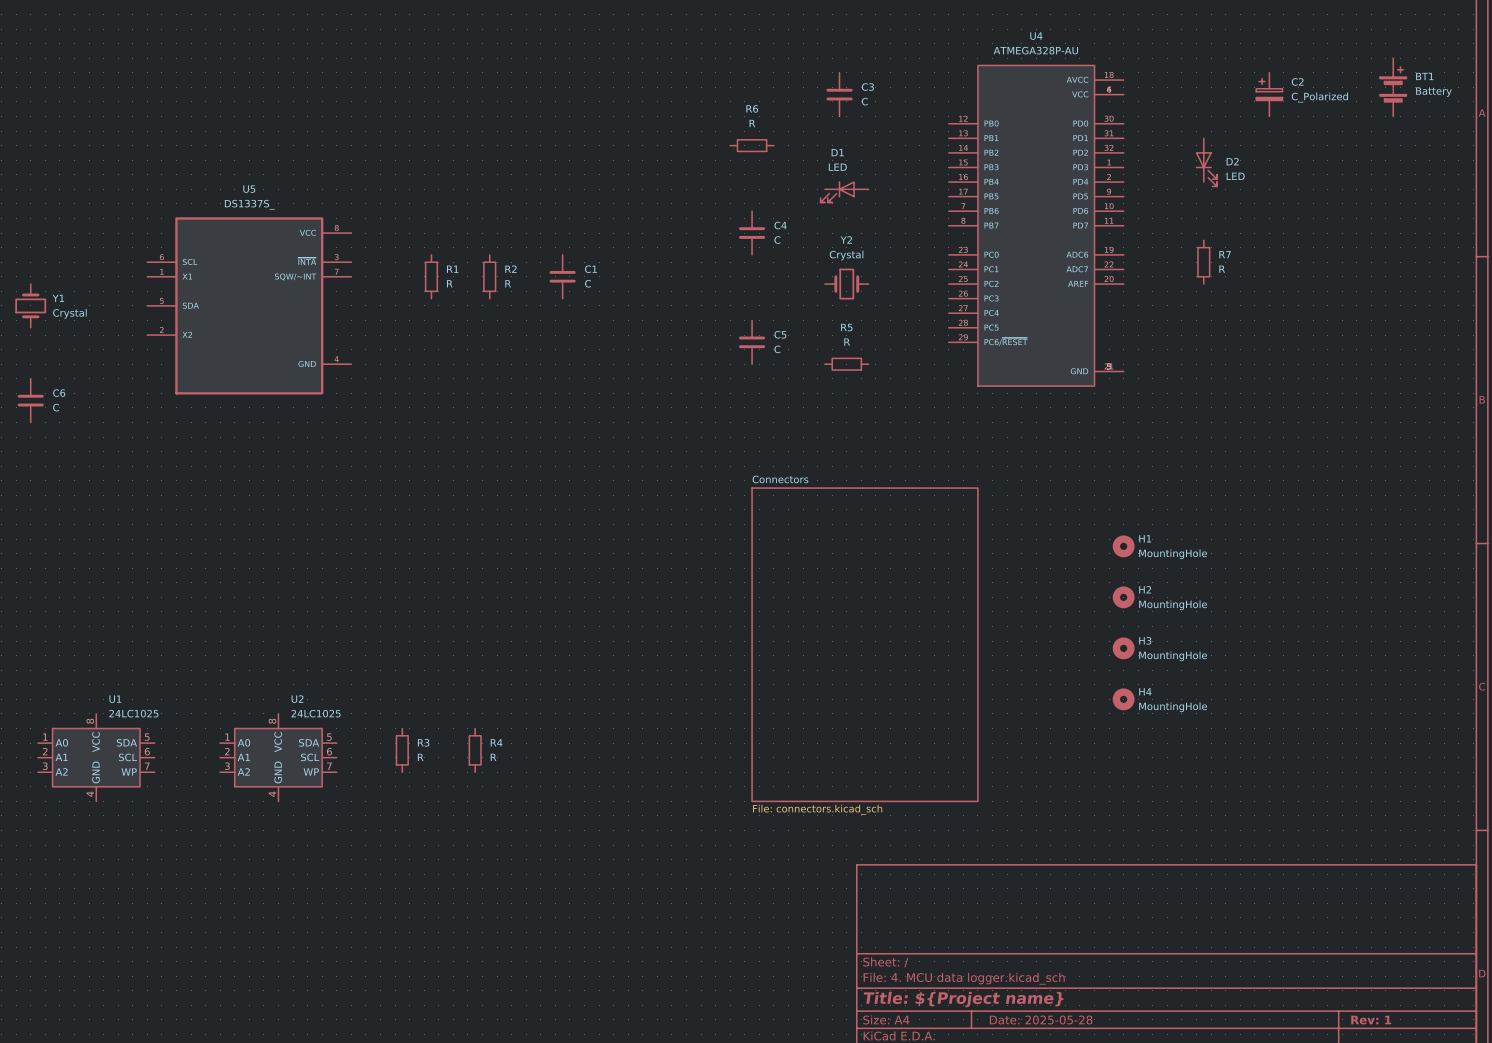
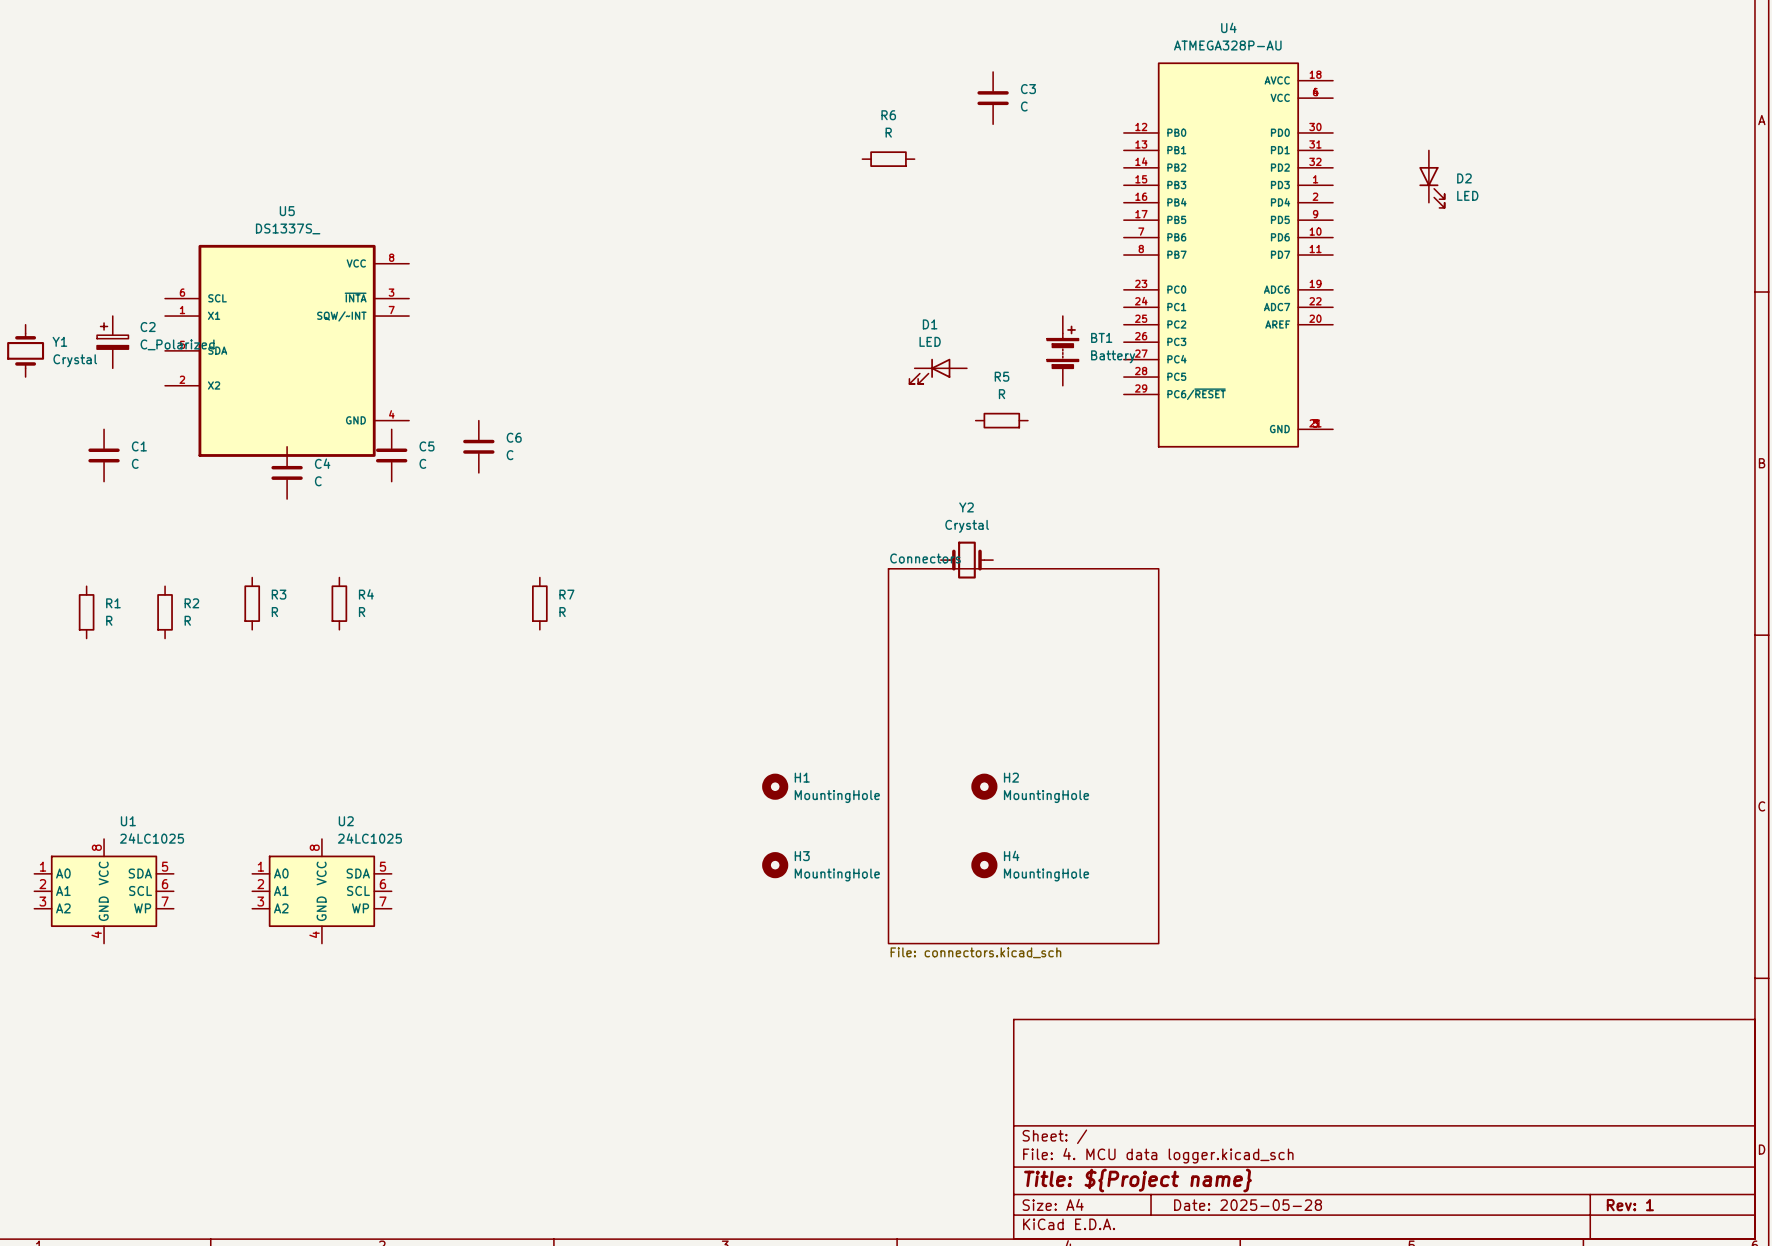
BT1 position: (1393, 87) -> (1062, 350)
C2 position: (1269, 94) -> (112, 342)
D1 position: (844, 191) -> (938, 371)
C4 position: (752, 233) -> (287, 472)
R7 position: (1203, 262) -> (539, 603)
R1 position: (431, 276) -> (86, 612)
R2 position: (489, 276) -> (165, 612)
C1 position: (562, 276) -> (104, 455)
Y2 position: (846, 284) -> (966, 560)
C5 position: (752, 342) -> (391, 455)
C6 position: (30, 400) -> (478, 446)
H1 position: (1123, 546) -> (775, 786)
H2 position: (1123, 597) -> (984, 786)
H3 position: (1123, 648) -> (775, 865)
H4 position: (1123, 699) -> (984, 865)
R3 position: (402, 750) -> (252, 603)
R4 position: (475, 750) -> (339, 603)

